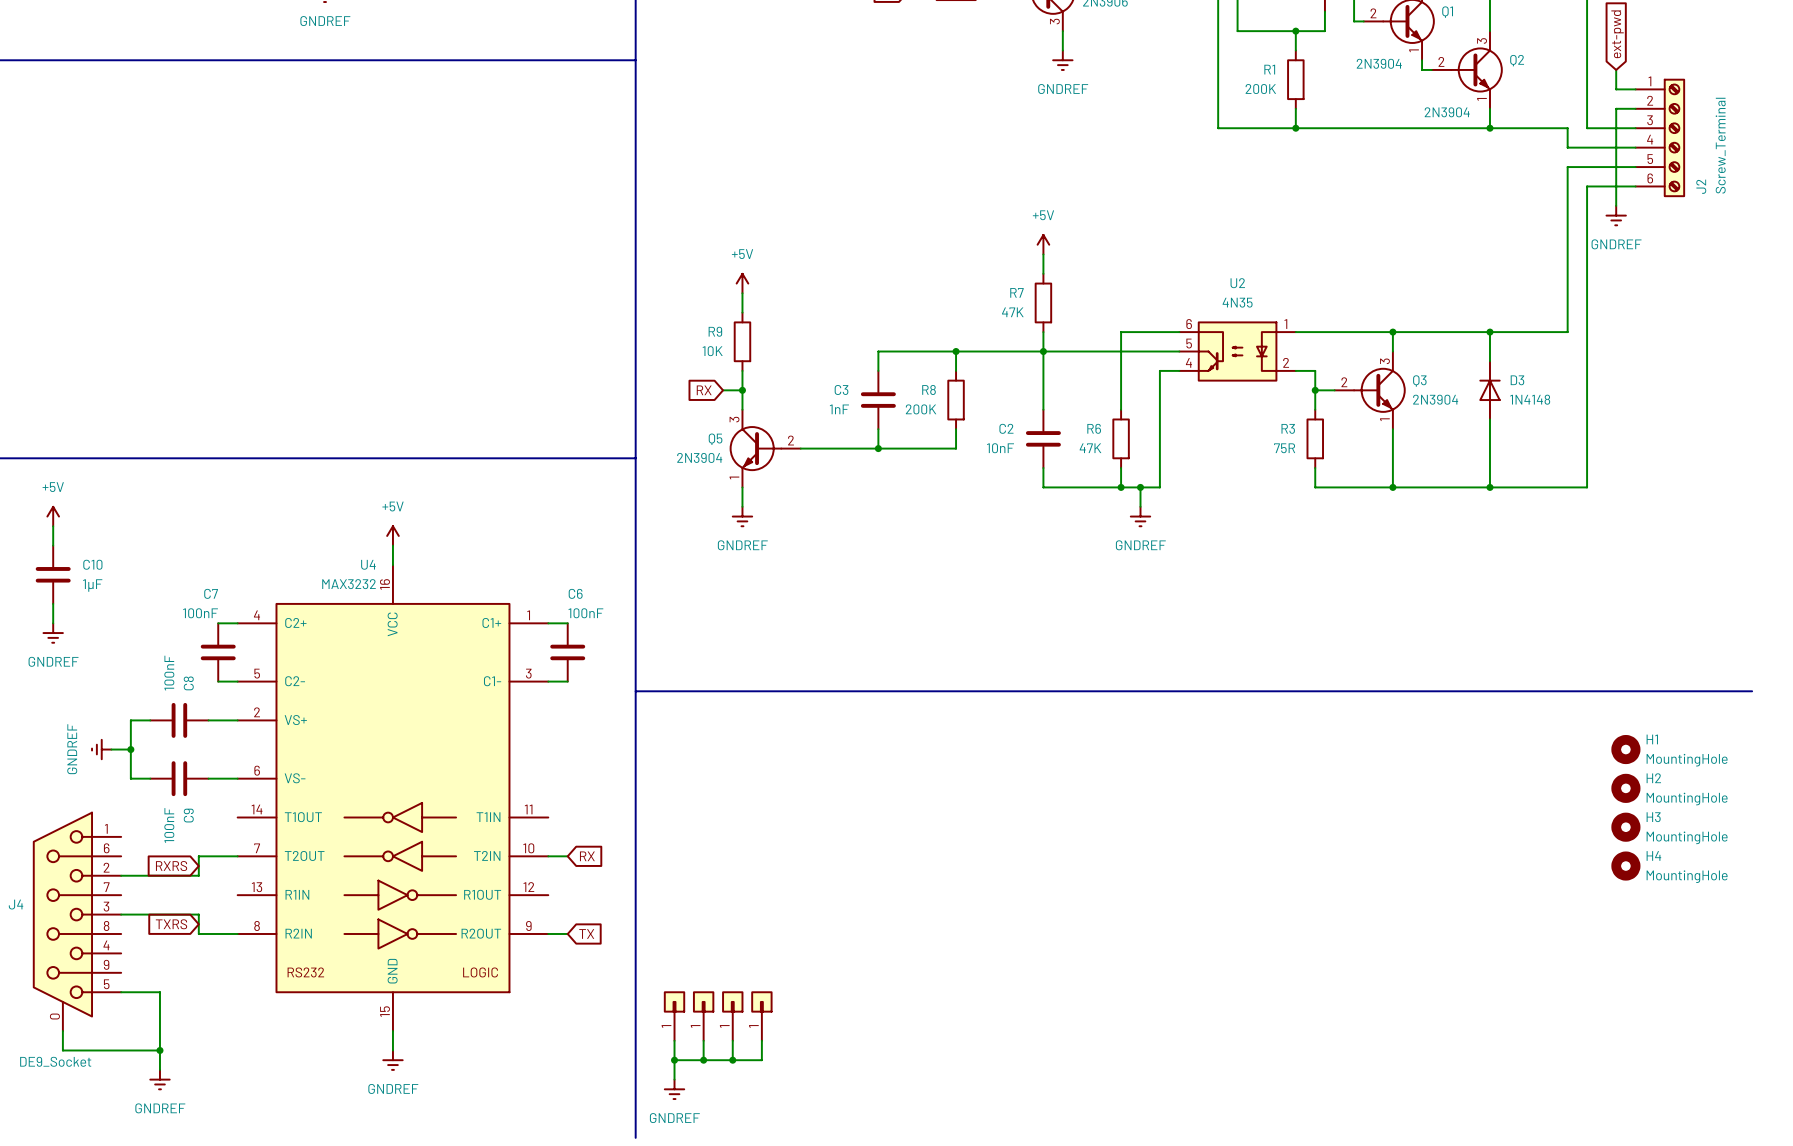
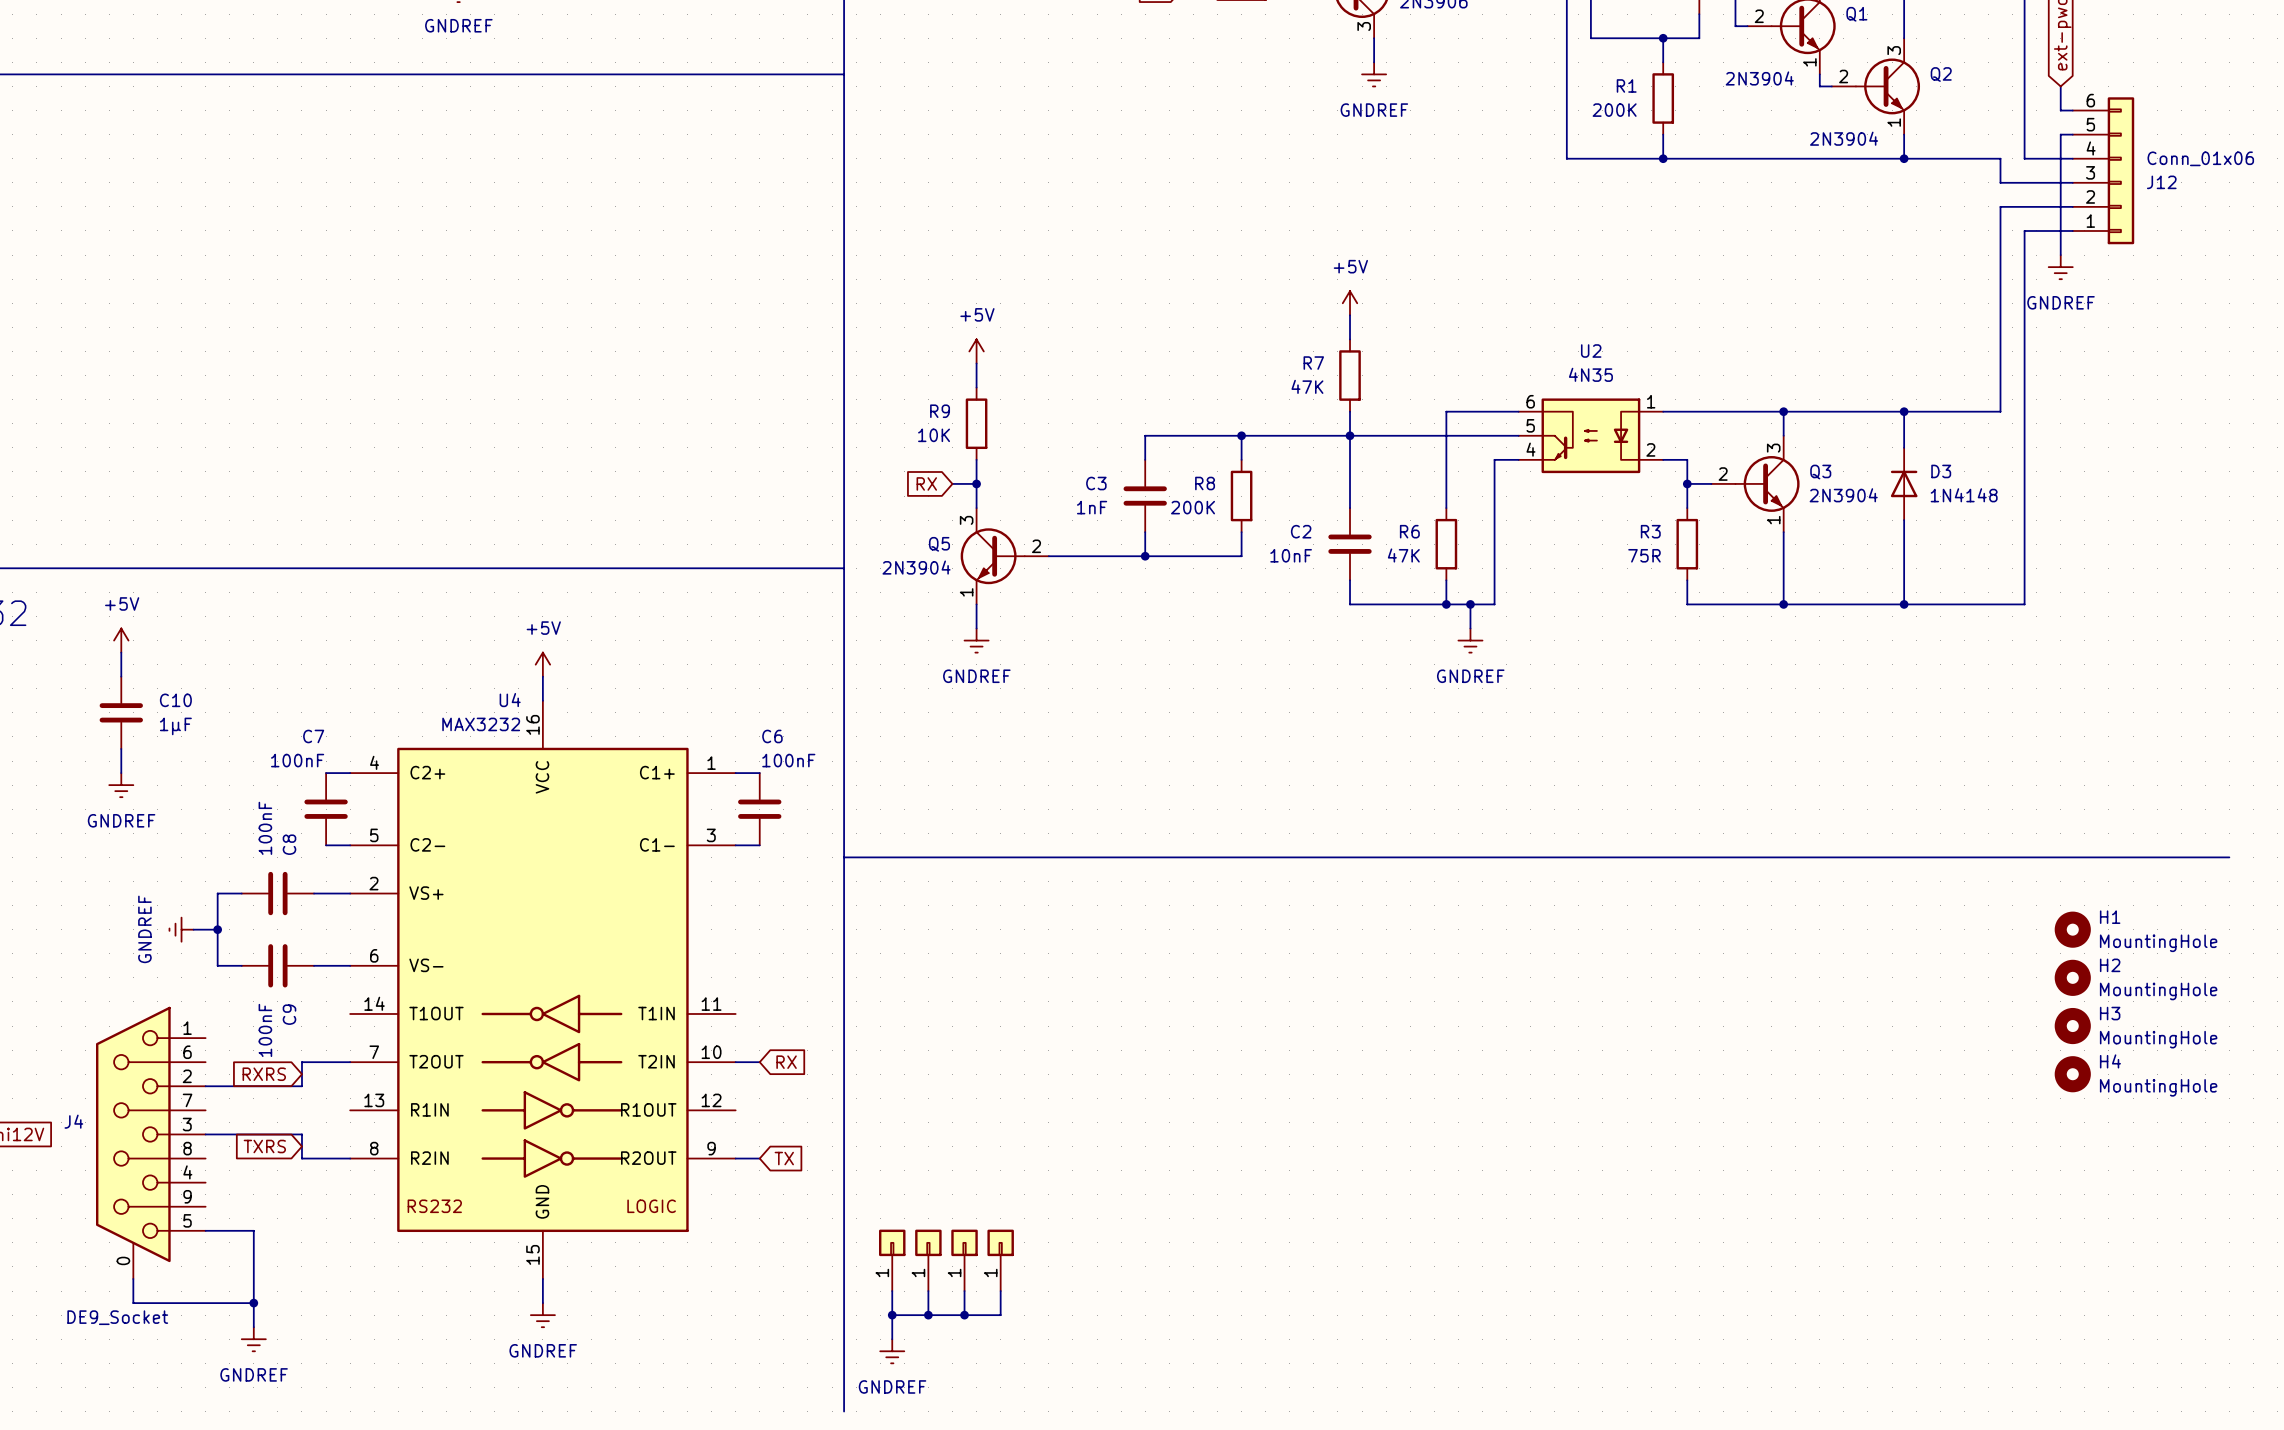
J12: none -> Conn_01x06 (2103, 170)
J2: Screw_Terminal (1660, 137) -> none

